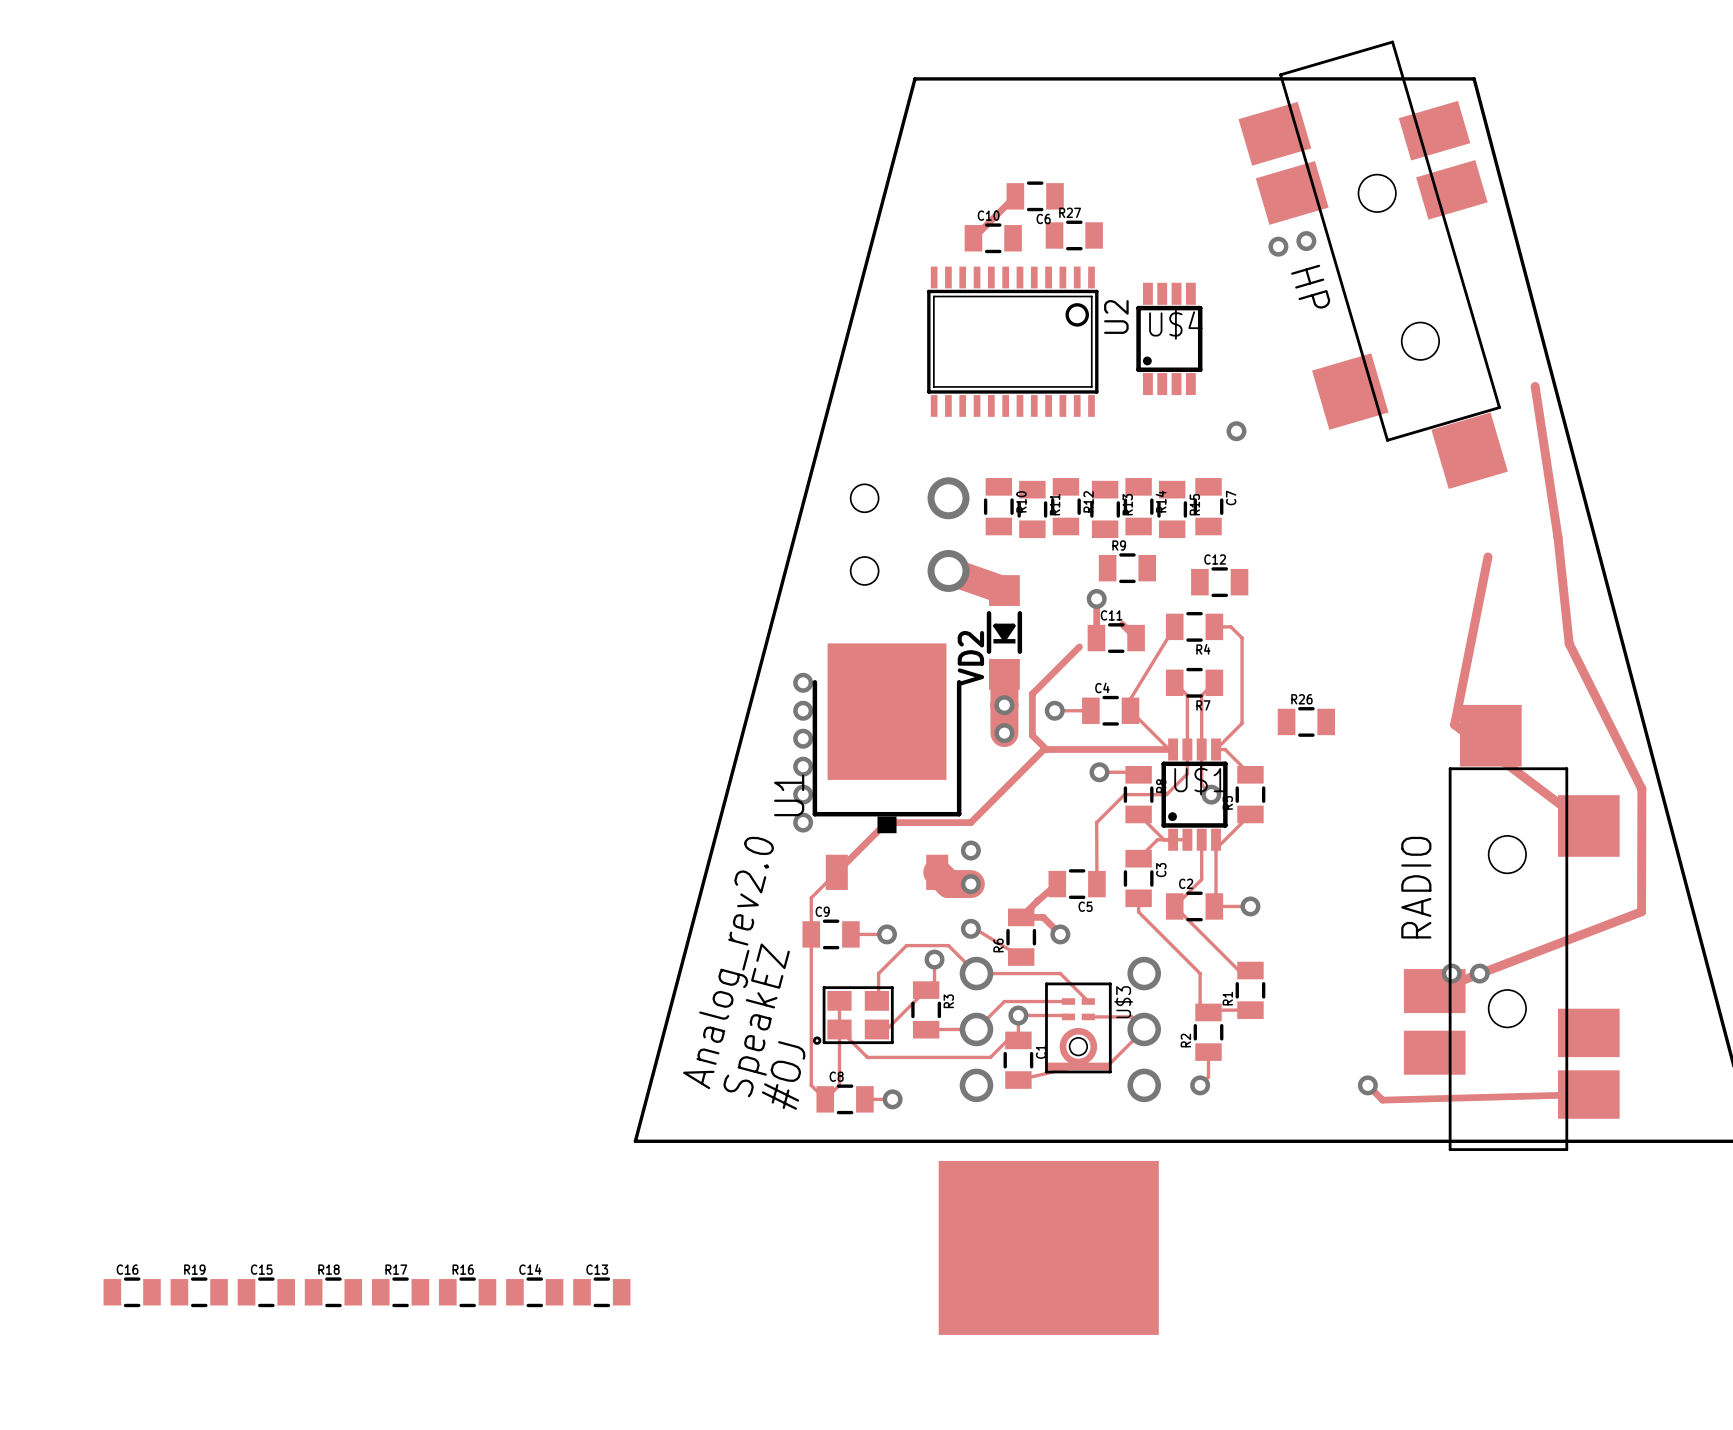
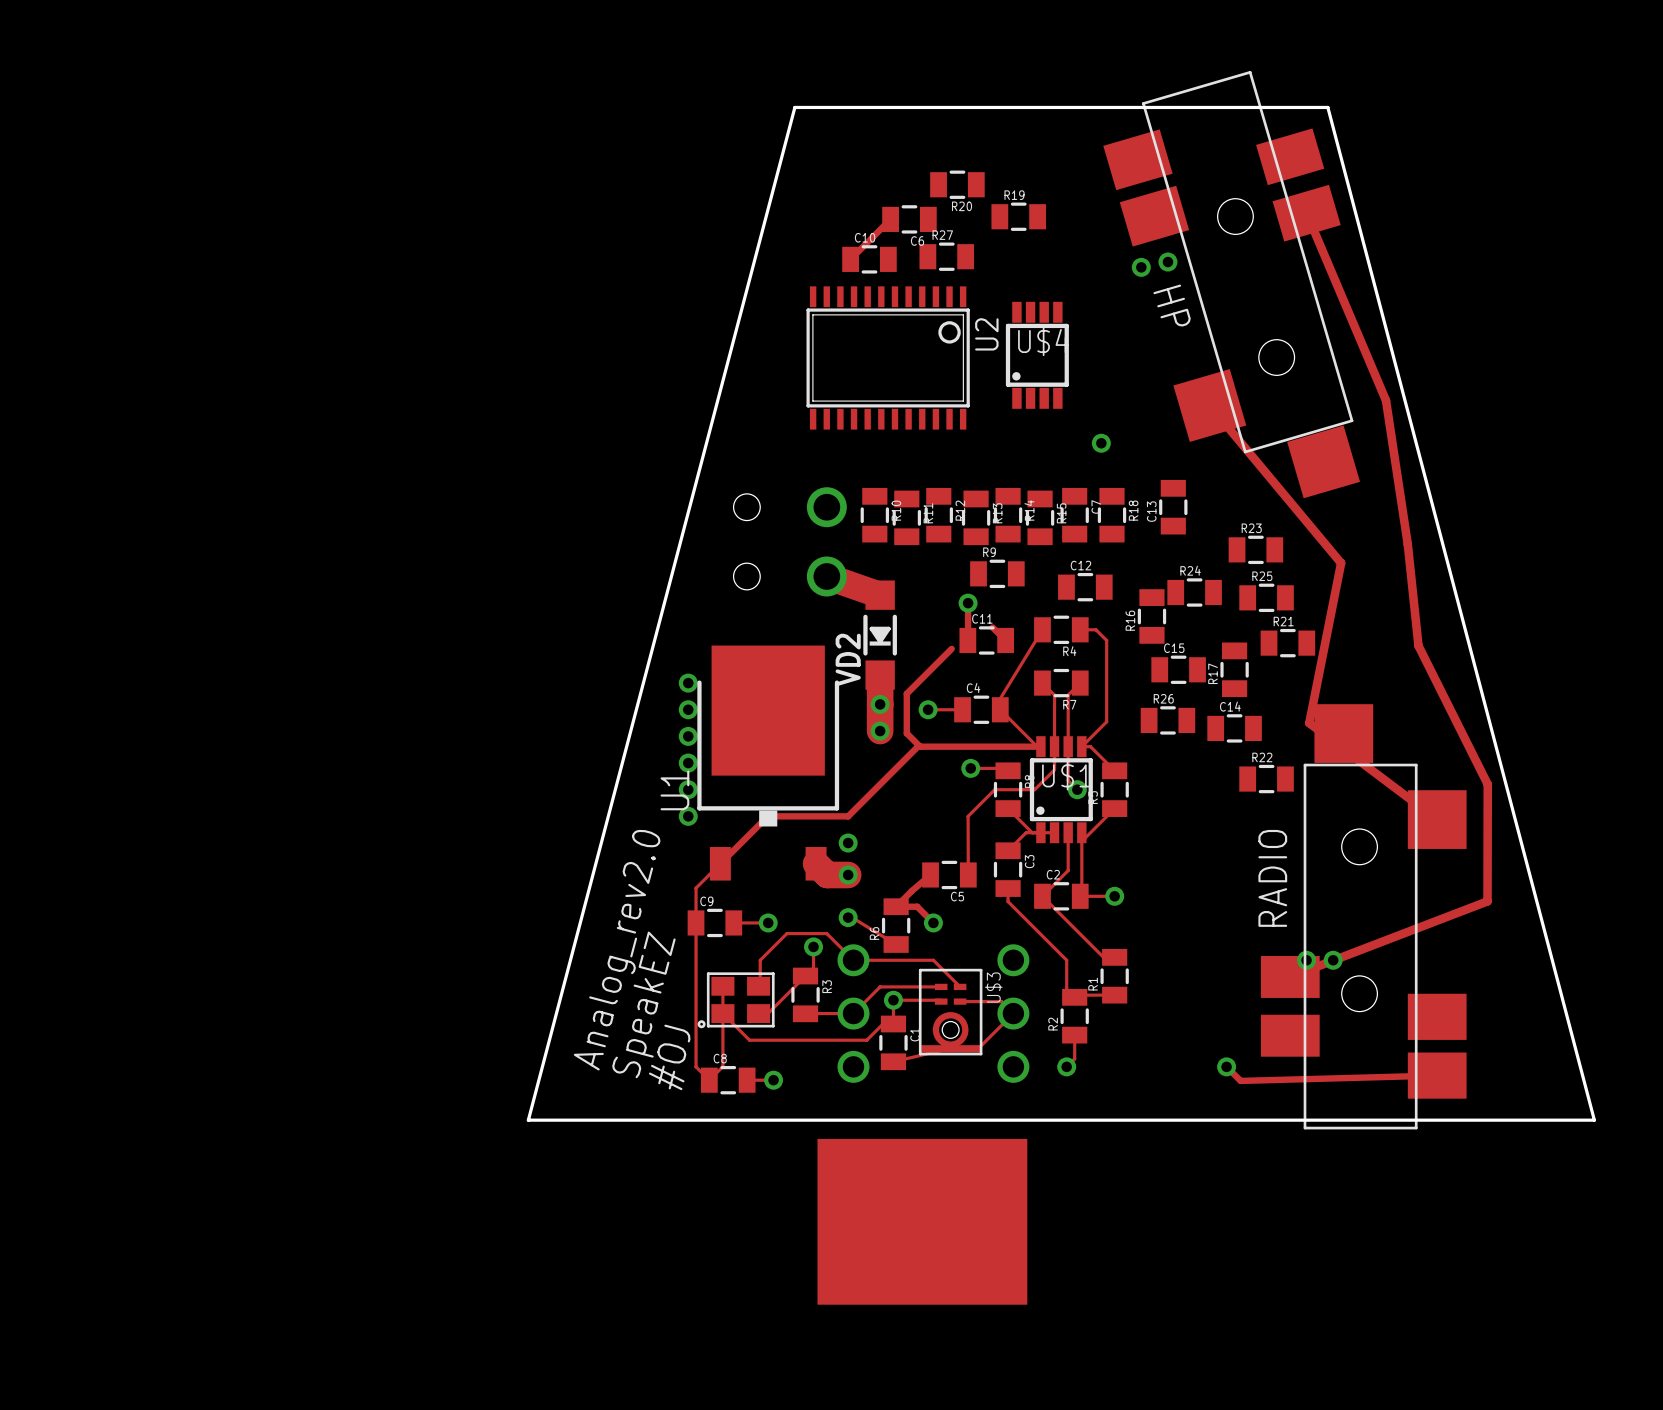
R20: none -> (957, 184)
track: none -> (1306, 213) (1386, 400)
track: none -> (1209, 405) (1341, 563)
R23: none -> (1255, 549)
R24: none -> (1194, 592)
R25: none -> (1266, 597)
R21: none -> (1287, 643)
R22: none -> (1266, 779)
C16: (132, 1292) -> none
R19 position: (199, 1292) -> (1018, 216)
C15 position: (266, 1292) -> (1178, 669)
R18 rotation: 0° (333, 1292) -> 90° clockwise (1112, 515)
R18 position: (333, 1292) -> (1112, 515)
R17 rotation: 0° (400, 1292) -> 90° clockwise (1234, 669)
R17 position: (400, 1292) -> (1234, 669)
R16 rotation: 0° (467, 1292) -> 90° clockwise (1151, 616)
R16 position: (467, 1292) -> (1151, 616)
C14 position: (534, 1292) -> (1234, 728)
C13 rotation: 0° (601, 1292) -> 90° clockwise (1173, 507)
C13 position: (601, 1292) -> (1173, 507)

